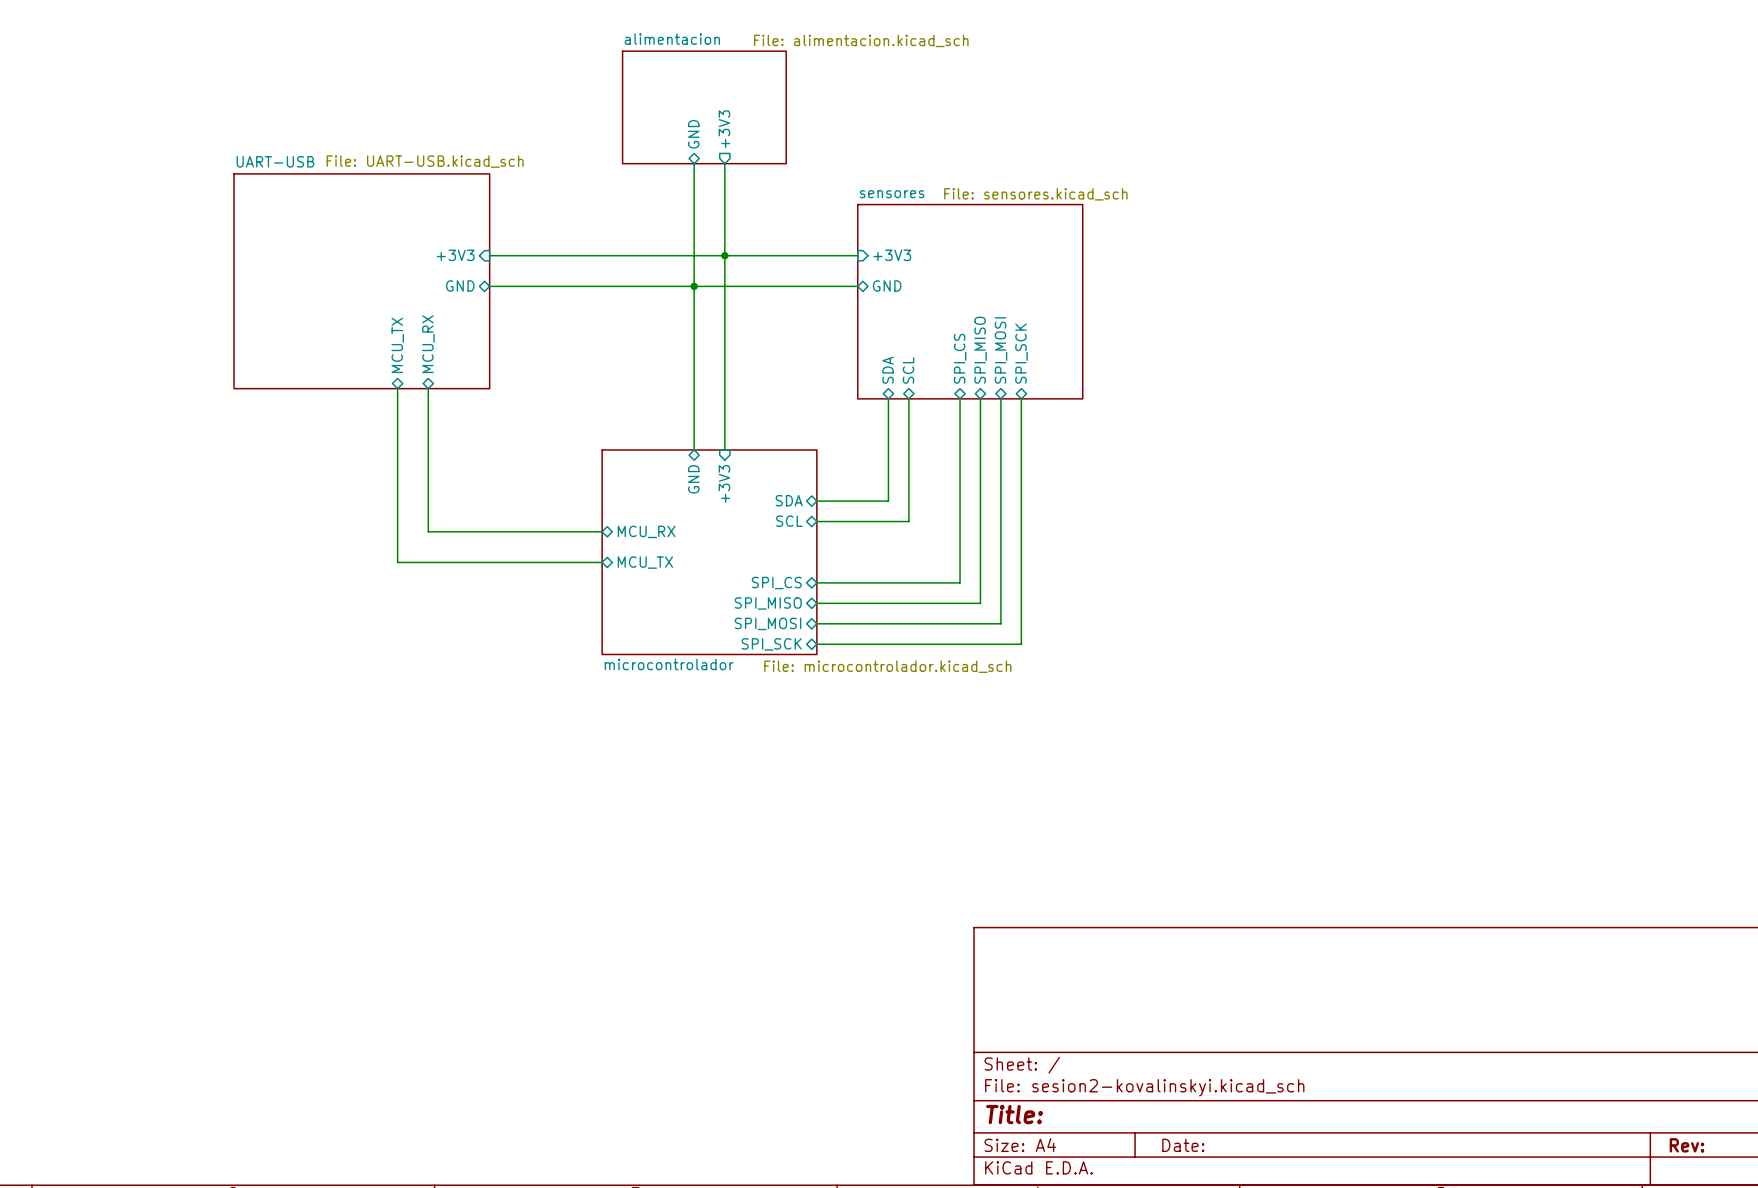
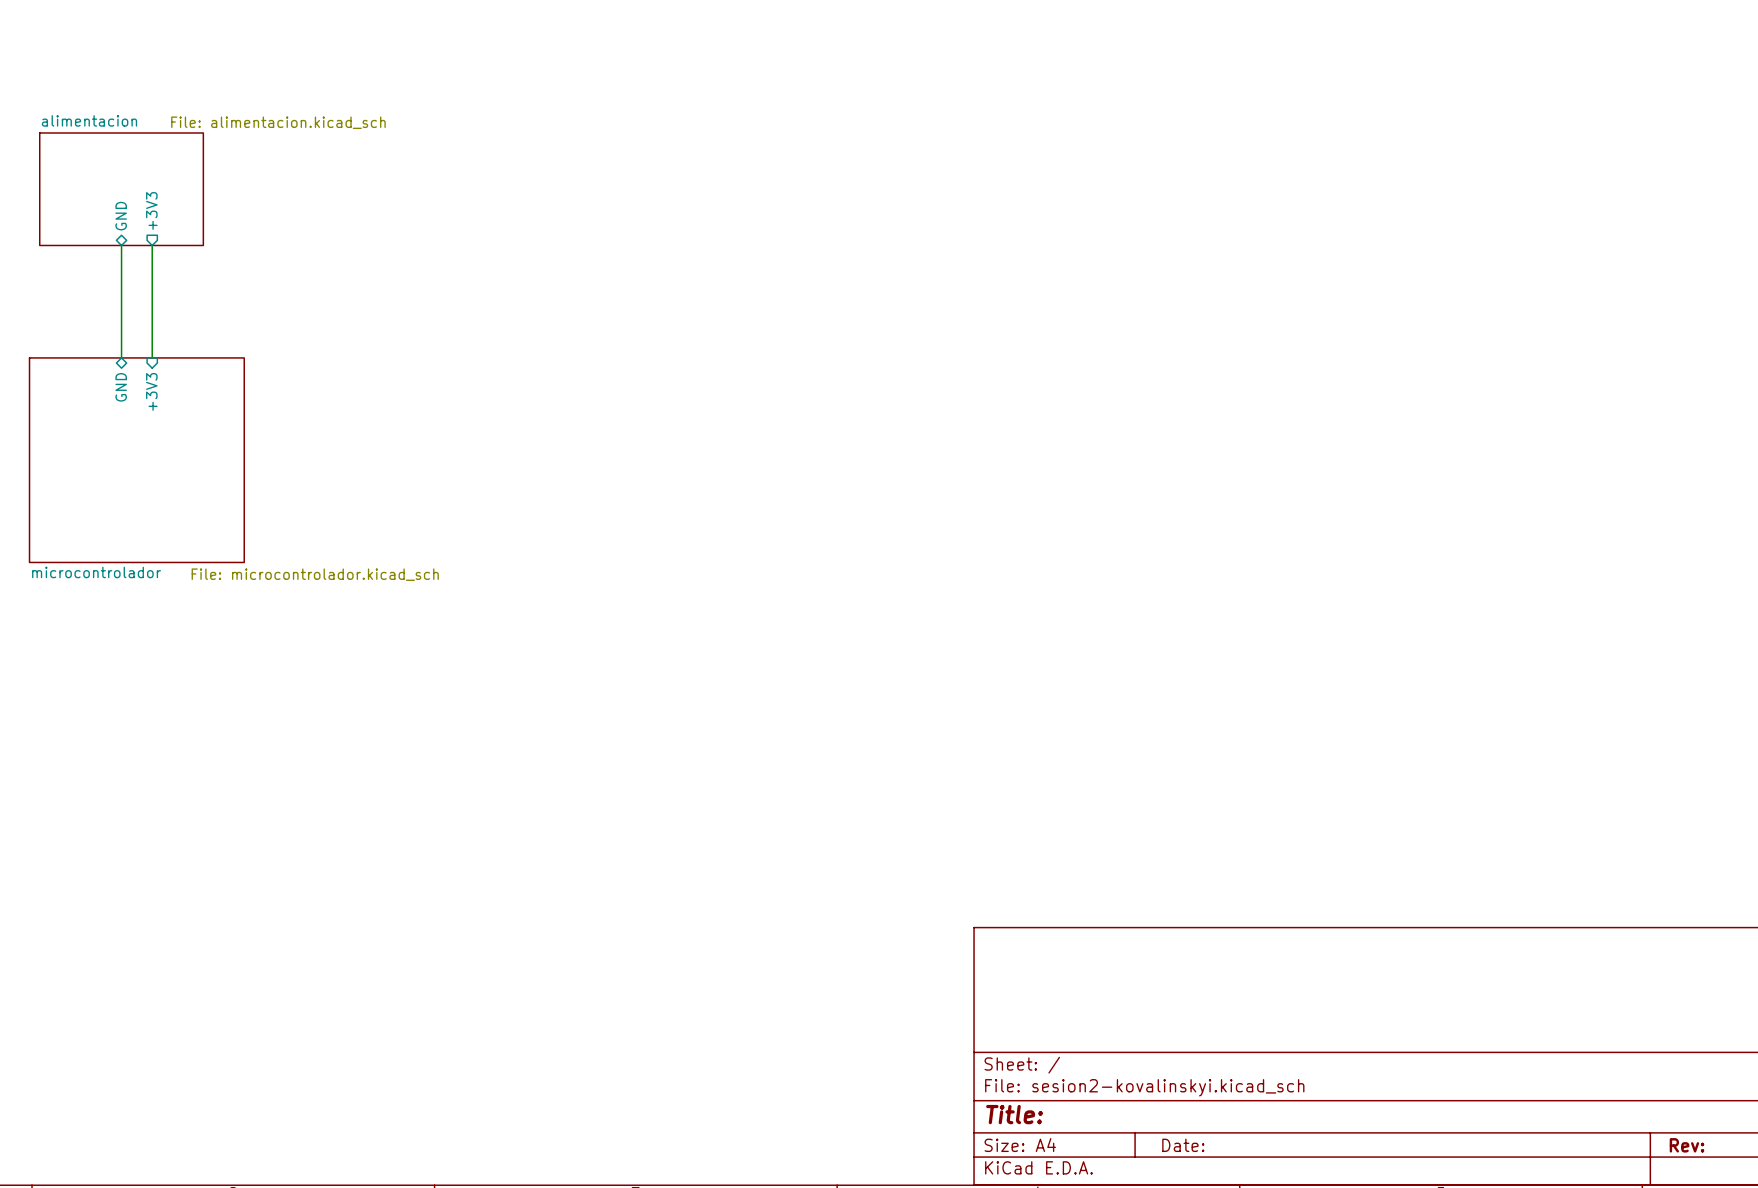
sheet alimentacion: File: alimentacion.kicad_sch (704, 107) -> none
sheet pin: +3V3 (724, 129) -> none
sheet pin: GND (693, 134) -> none
wire: (694, 163) (694, 449) -> none
wire: (724, 163) (724, 449) -> none
sheet alimentacion: none -> File: alimentacion.kicad_sch (121, 189)
sheet pin: none -> +3V3 (151, 210)
sheet pin: none -> GND (121, 216)
wire: none -> (121, 245) (121, 357)
wire: none -> (152, 245) (152, 357)
sheet pin: +3V3 (455, 255) -> none
wire: (489, 255) (857, 255) -> none
junction: (724, 255) -> none
sheet pin: +3V3 (892, 255) -> none
sheet UART-USB: File: UART-USB.kicad_sch (361, 281) -> none
sheet pin: GND (460, 285) -> none
sheet pin: GND (887, 285) -> none
wire: (489, 286) (857, 286) -> none
junction: (694, 286) -> none
sheet sensores: File: sensores.kicad_sch (970, 301) -> none
sheet pin: MCU_RX (428, 344) -> none
sheet pin: MCU_TX (397, 345) -> none
sheet pin: SPI_MISO (980, 350) -> none
sheet pin: SPI_MOSI (1001, 350) -> none
sheet pin: SPI_SCK (1021, 353) -> none
sheet pin: SPI_CS (960, 358) -> none
sheet pin: SDA (888, 370) -> none
sheet pin: SCL (908, 370) -> none
sheet pin: none -> GND (121, 387)
wire: (397, 388) (397, 562) (602, 562) -> none
wire: (428, 388) (428, 531) (602, 531) -> none
sheet pin: none -> +3V3 (151, 391)
wire: (888, 398) (888, 501) (816, 501) -> none
wire: (908, 398) (908, 521) (816, 521) -> none
wire: (960, 398) (960, 582) (816, 582) -> none
wire: (980, 398) (980, 603) (816, 603) -> none
wire: (1000, 398) (1000, 623) (816, 623) -> none
wire: (1021, 398) (1021, 644) (816, 644) -> none
sheet microcontrolador: none -> File: microcontrolador.kicad_sch (136, 460)
sheet pin: GND (693, 479) -> none
sheet pin: +3V3 (724, 483) -> none
sheet pin: SDA (789, 500) -> none
sheet pin: SCL (789, 521) -> none
sheet pin: MCU_RX (646, 531) -> none
sheet microcontrolador: File: microcontrolador.kicad_sch (709, 552) -> none
sheet pin: MCU_TX (645, 562) -> none
sheet pin: SPI_CS (776, 583) -> none
sheet pin: SPI_MISO (768, 603) -> none
sheet pin: SPI_MOSI (768, 623) -> none
sheet pin: SPI_SCK (771, 644) -> none

